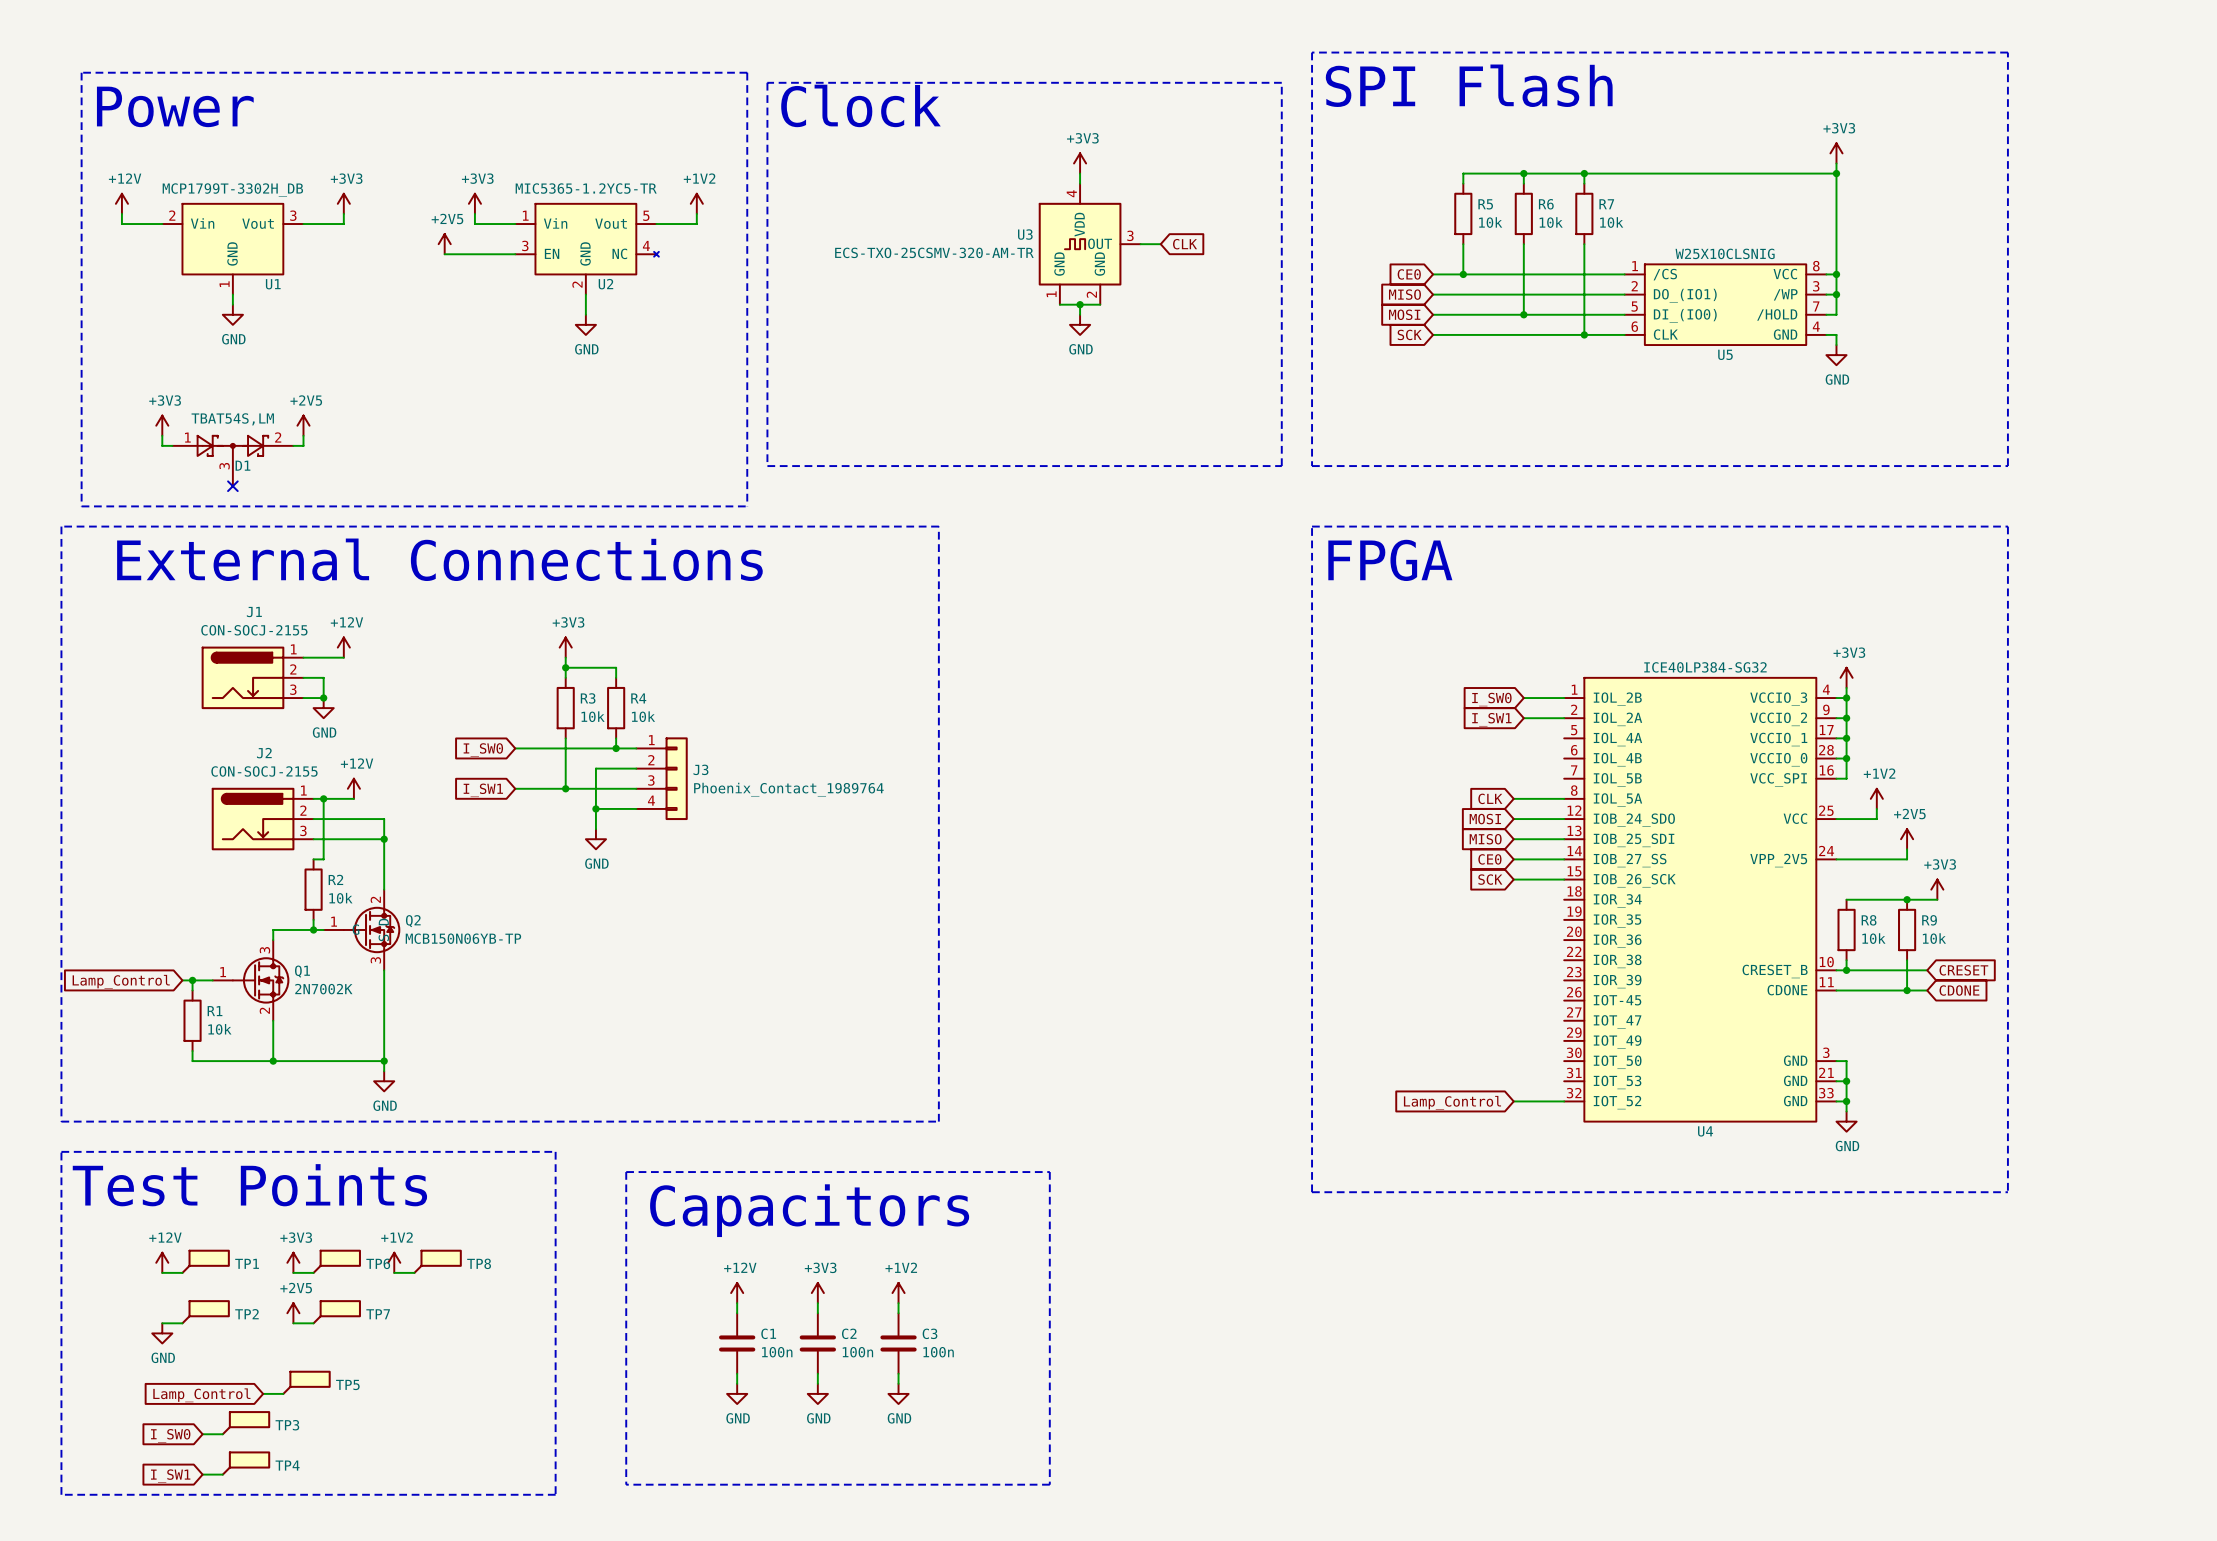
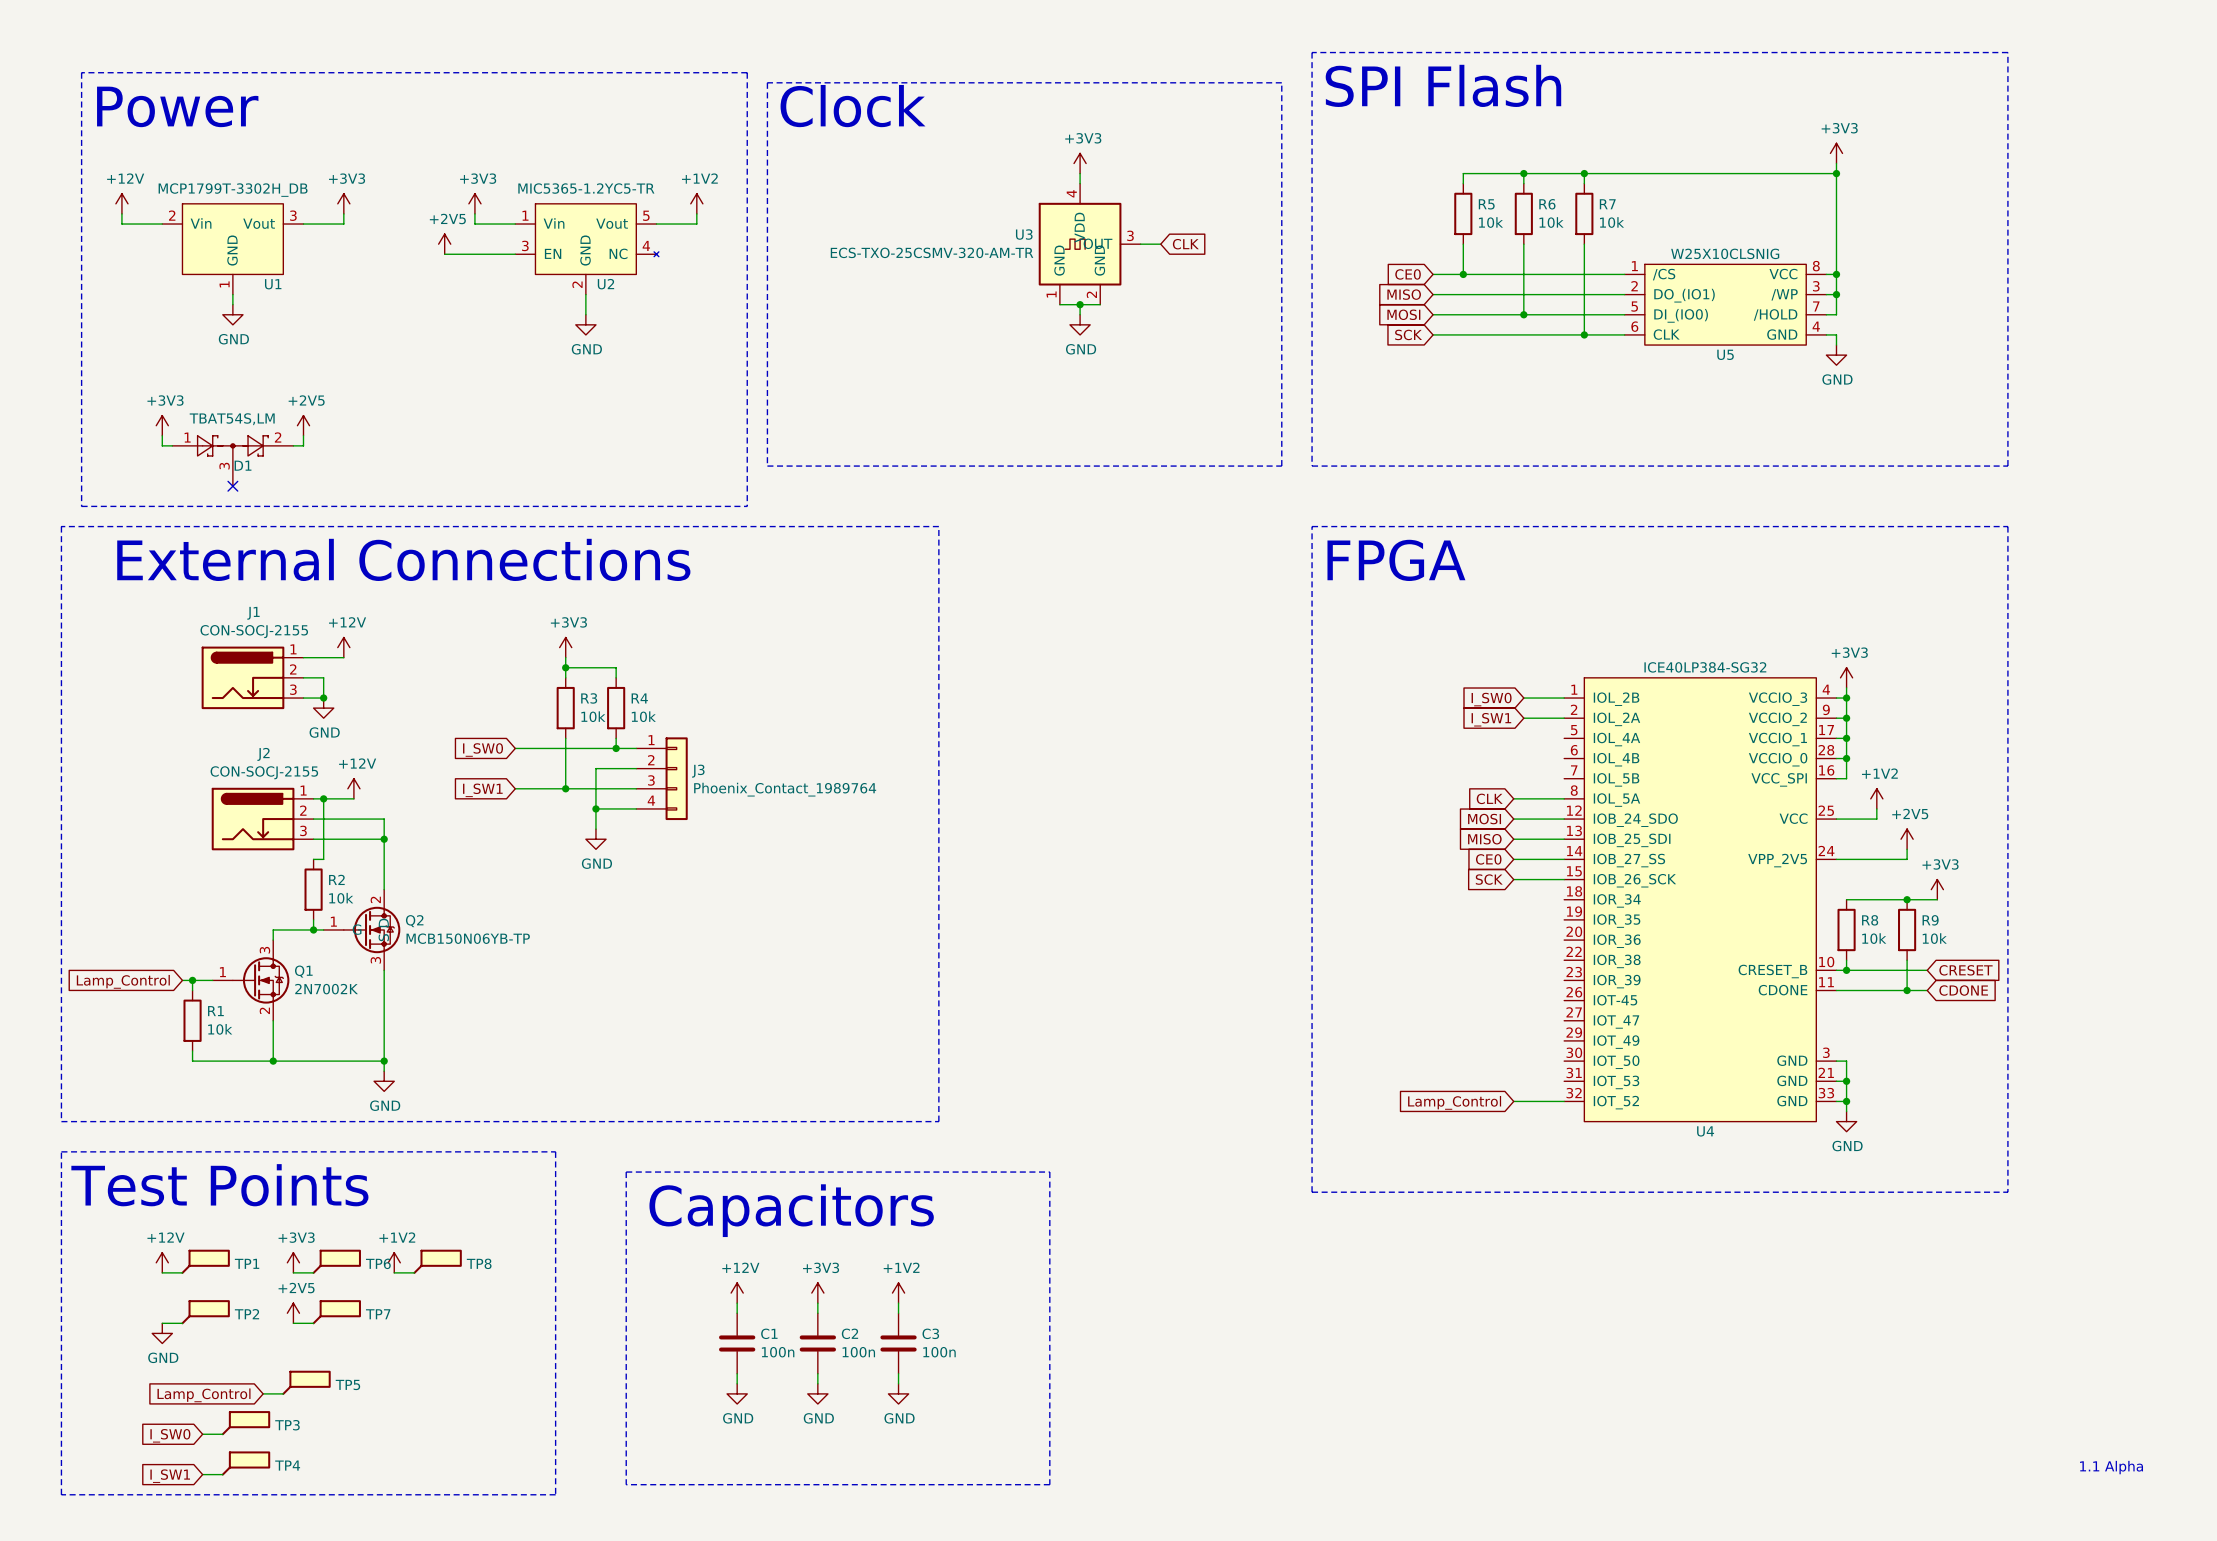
text: none -> 1.1 Alpha (2111, 1467)

